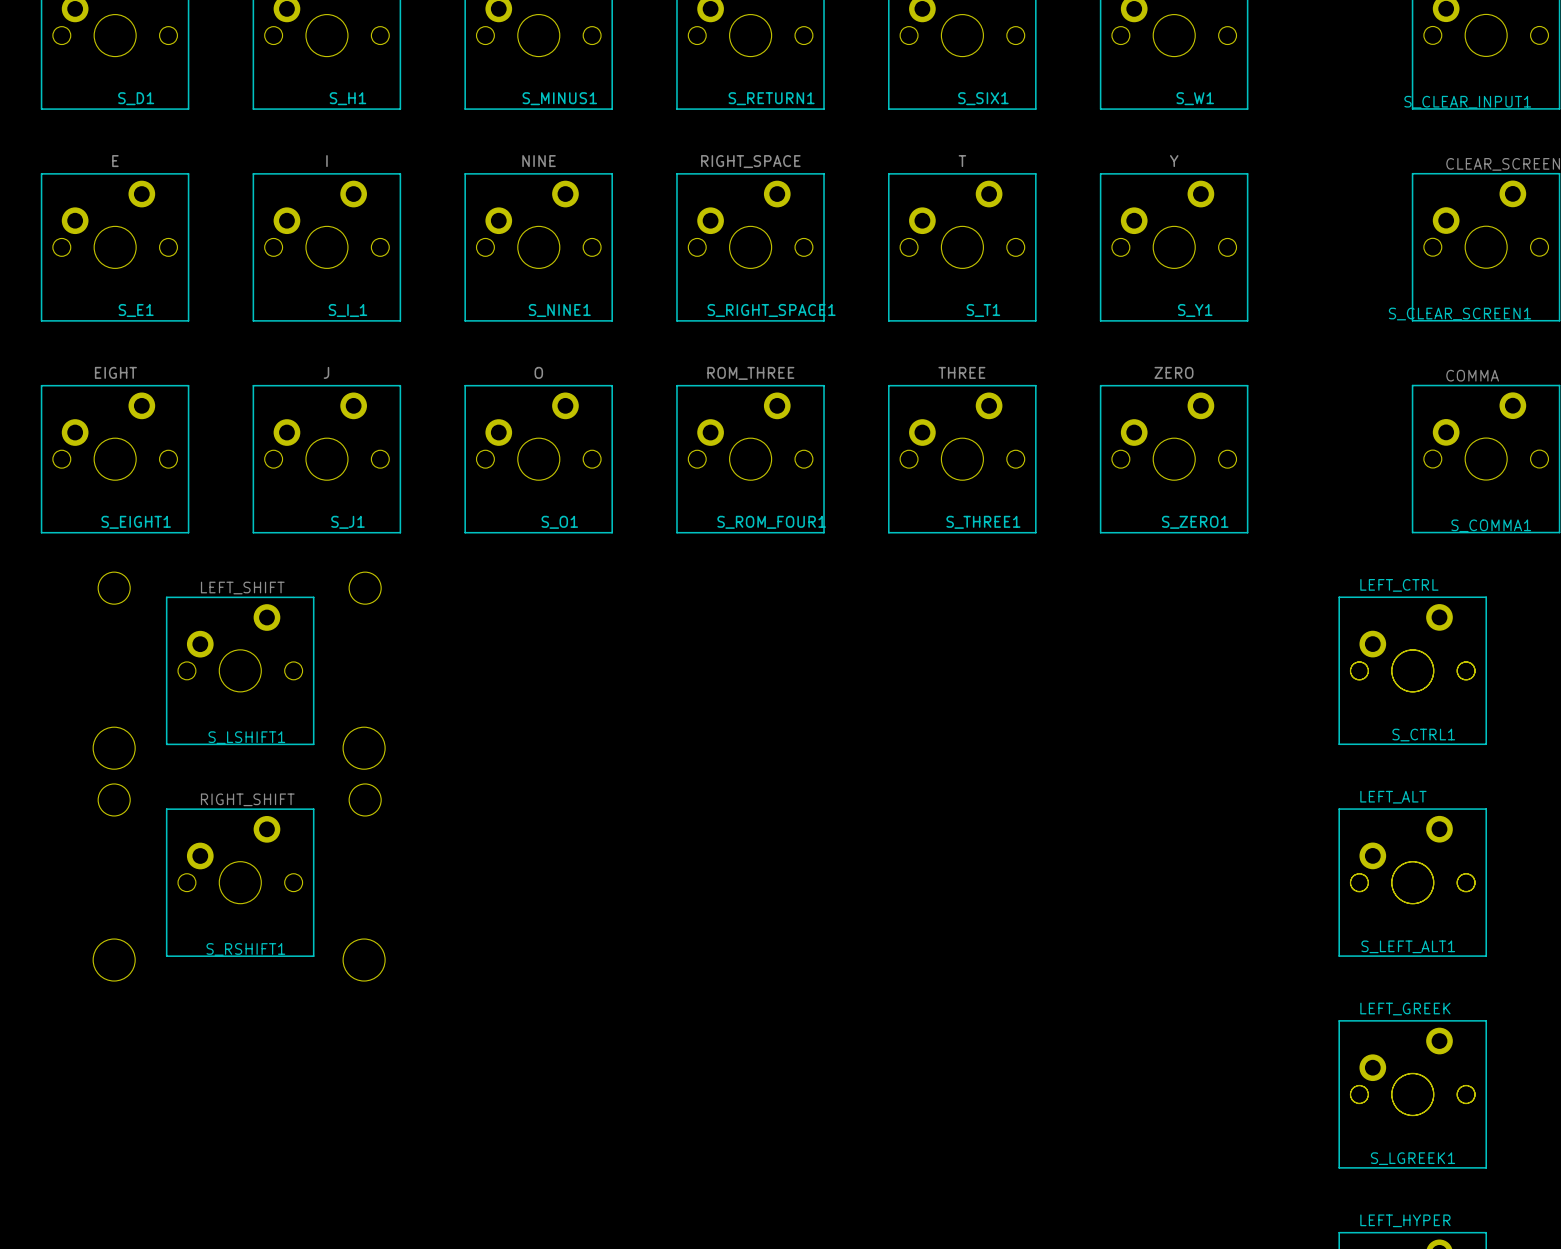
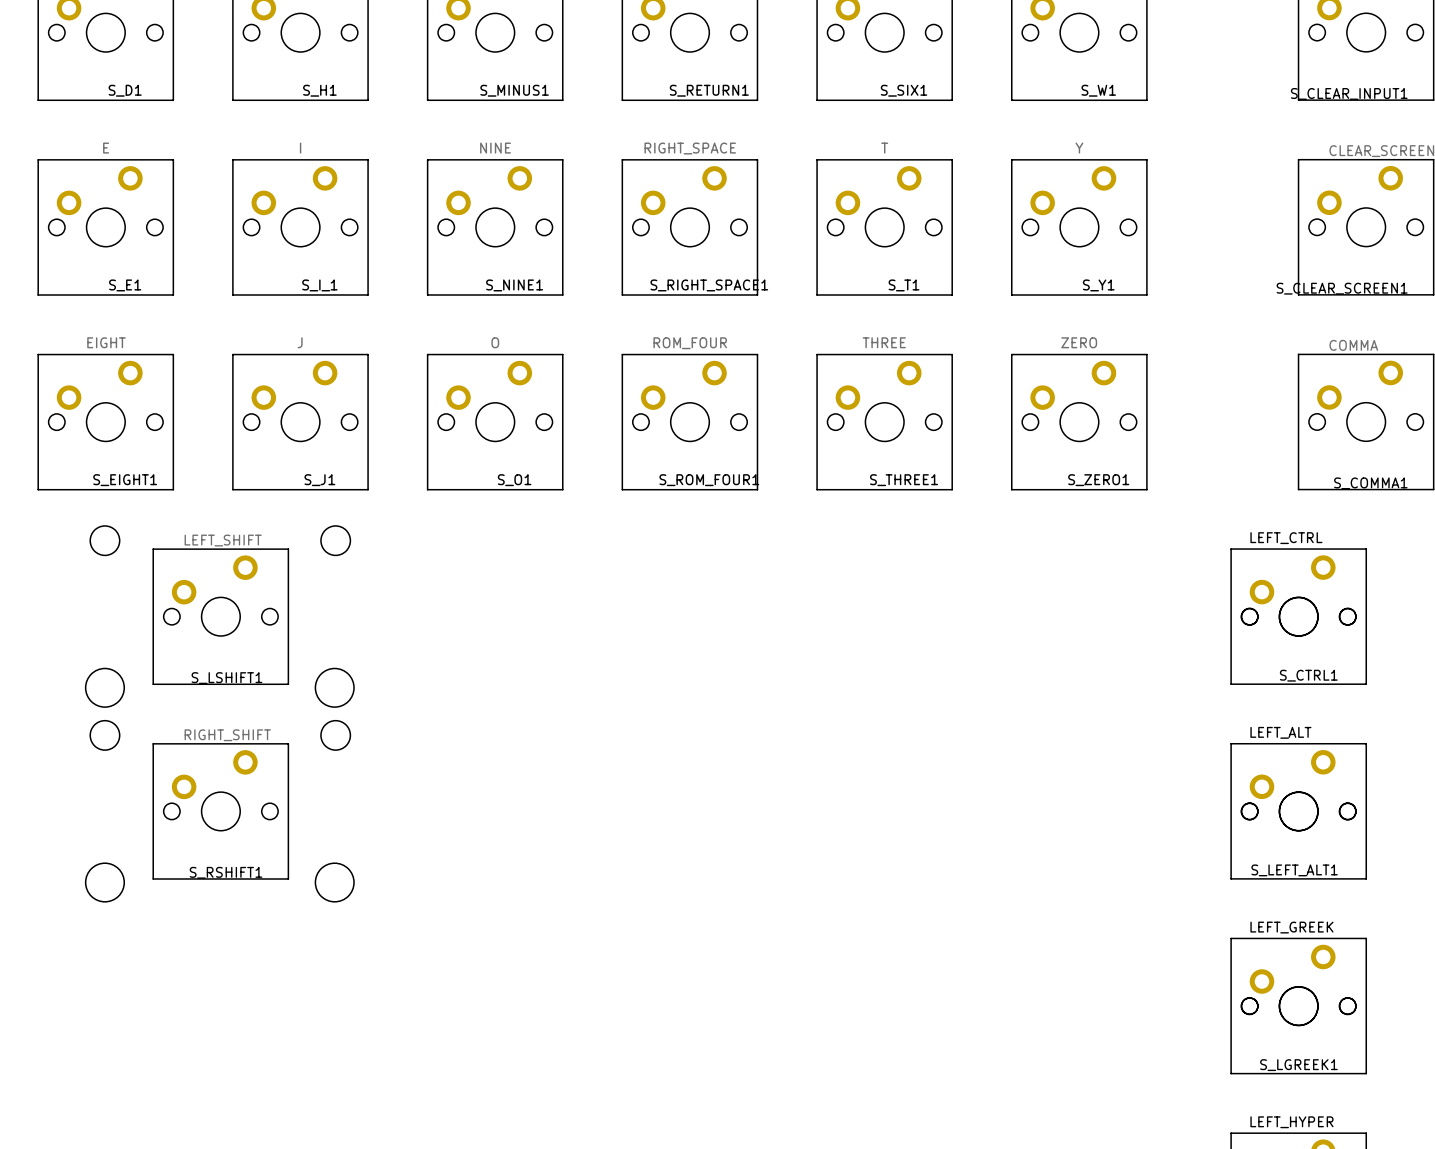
S_ROM_FOUR1 value: ROM_THREE (750, 373) -> ROM_FOUR (690, 343)

